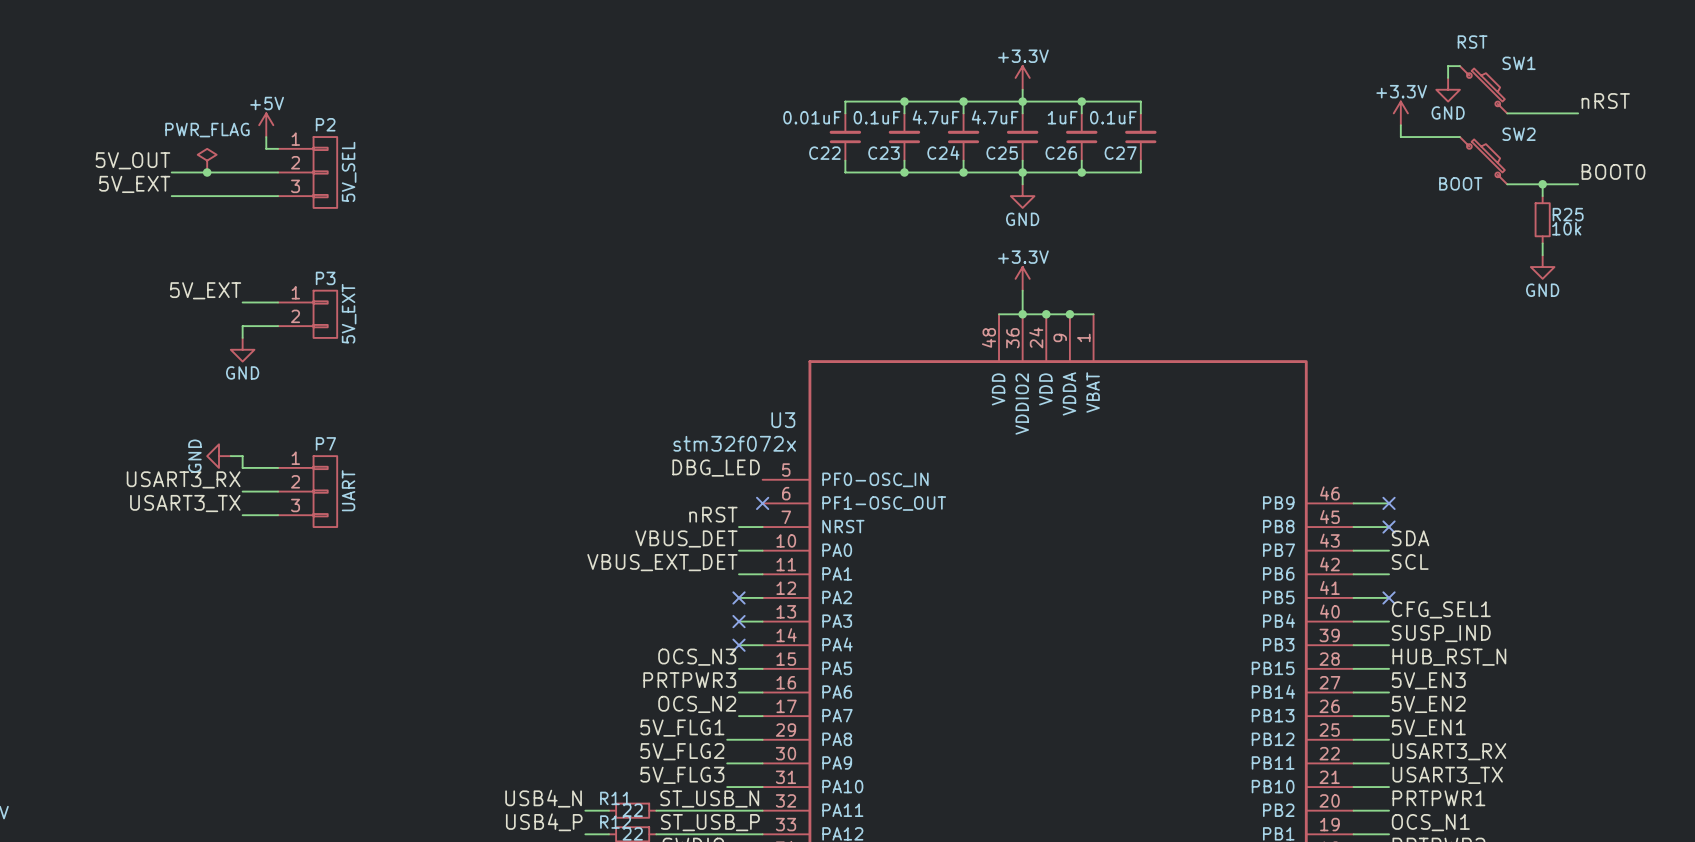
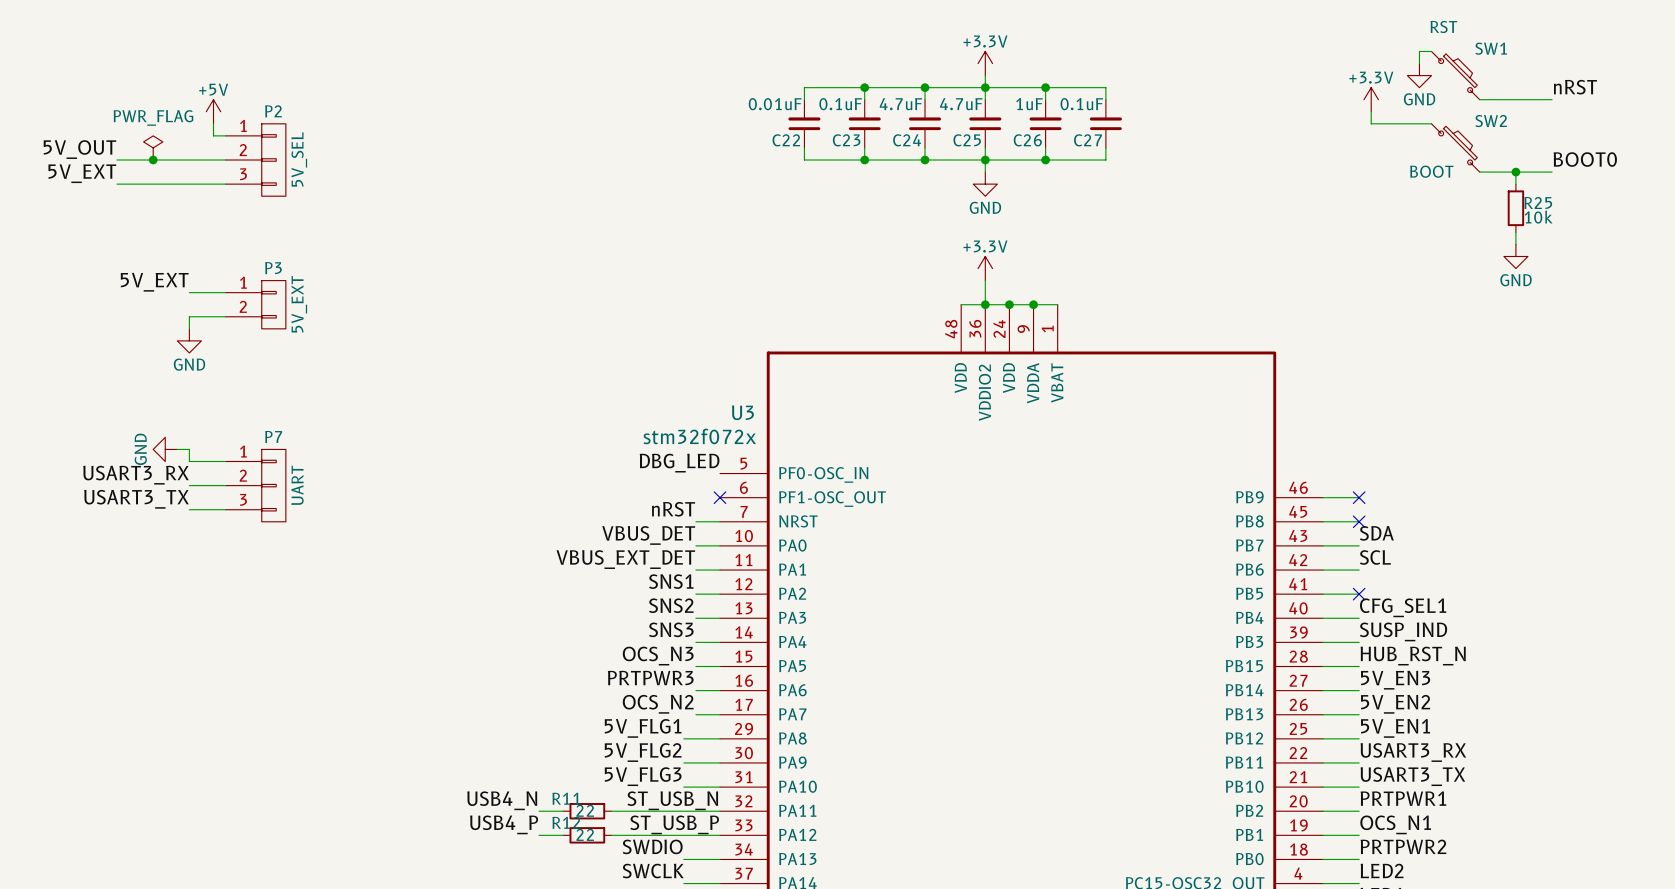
label: none -> SNS1 (671, 581)
no-connect mark: (739, 597) -> none
label: none -> SNS2 (671, 605)
no-connect mark: (739, 621) -> none
label: none -> SNS3 (671, 629)
no-connect mark: (739, 645) -> none

